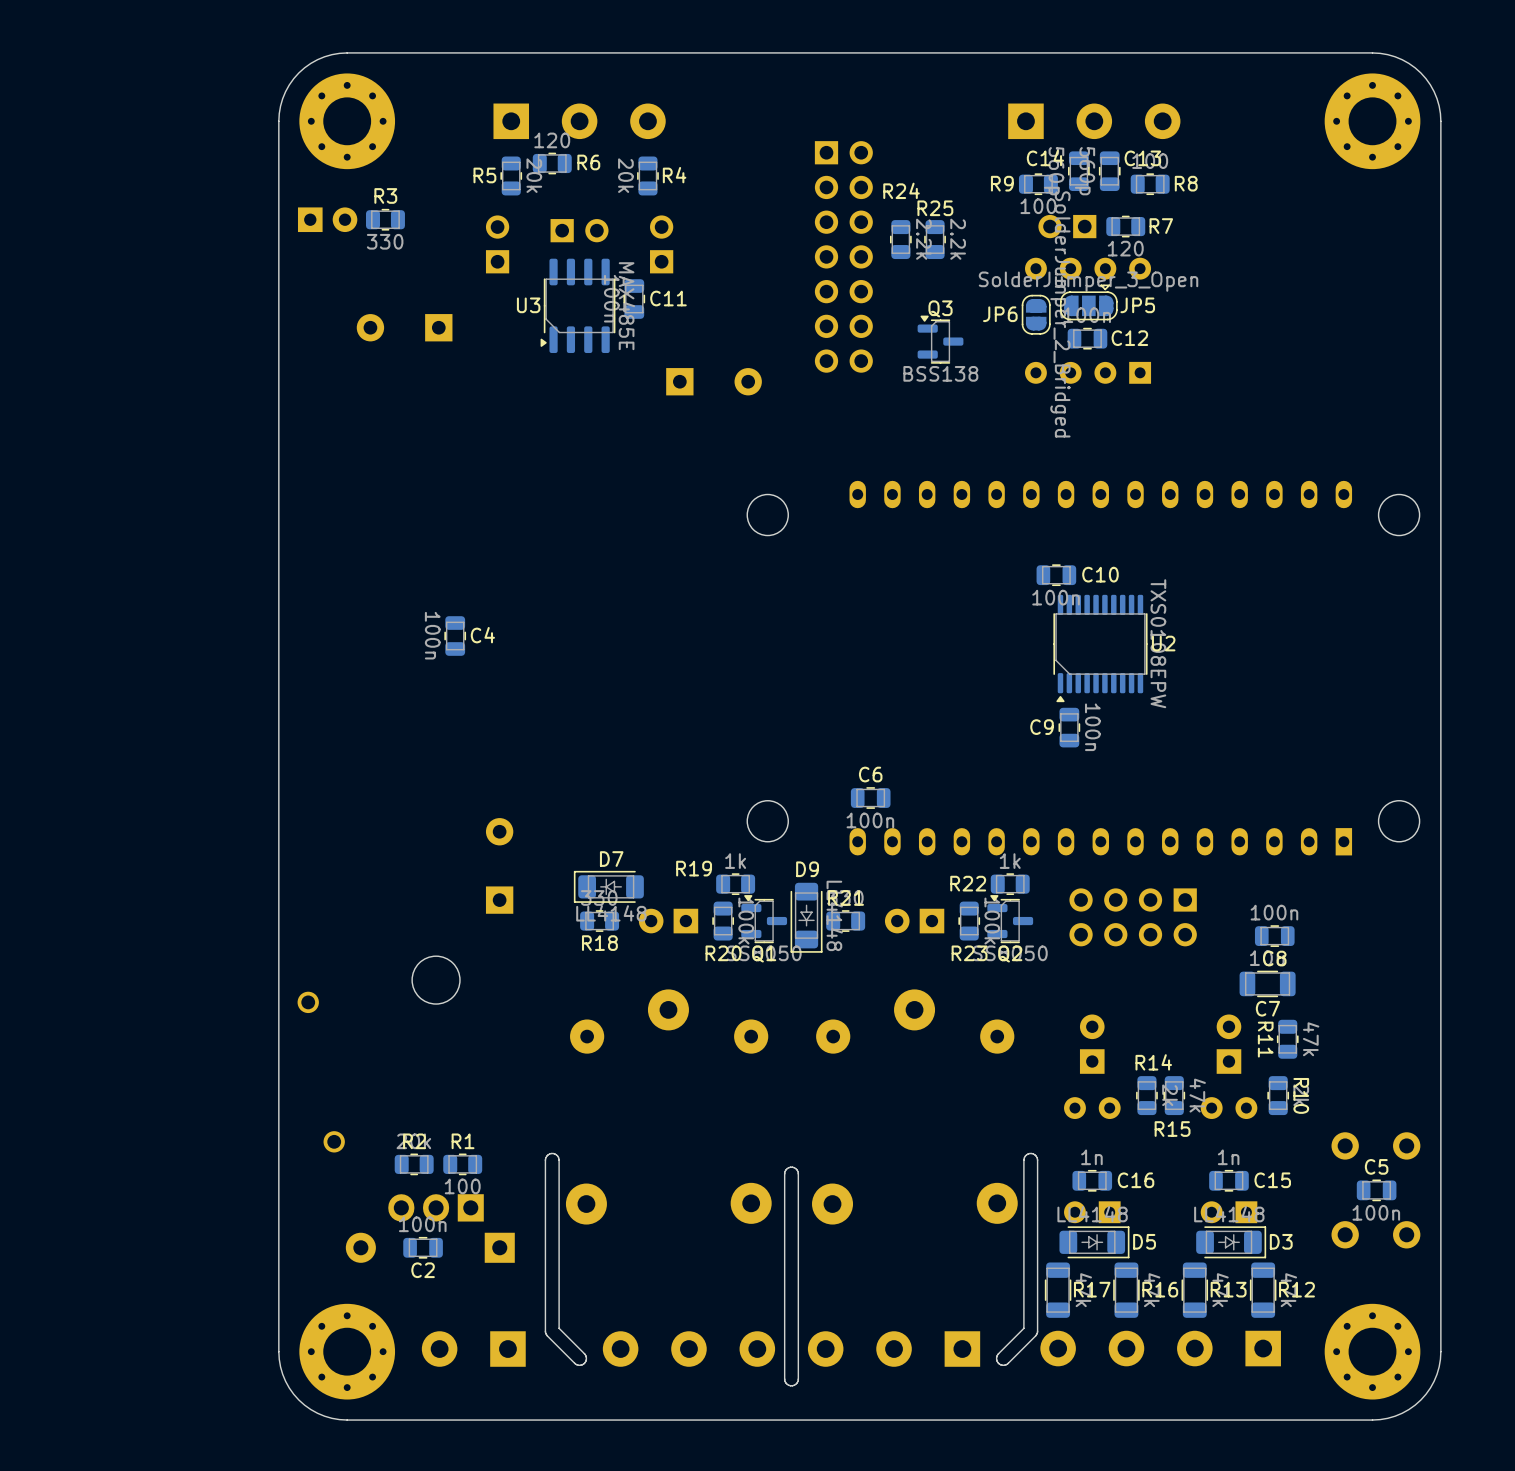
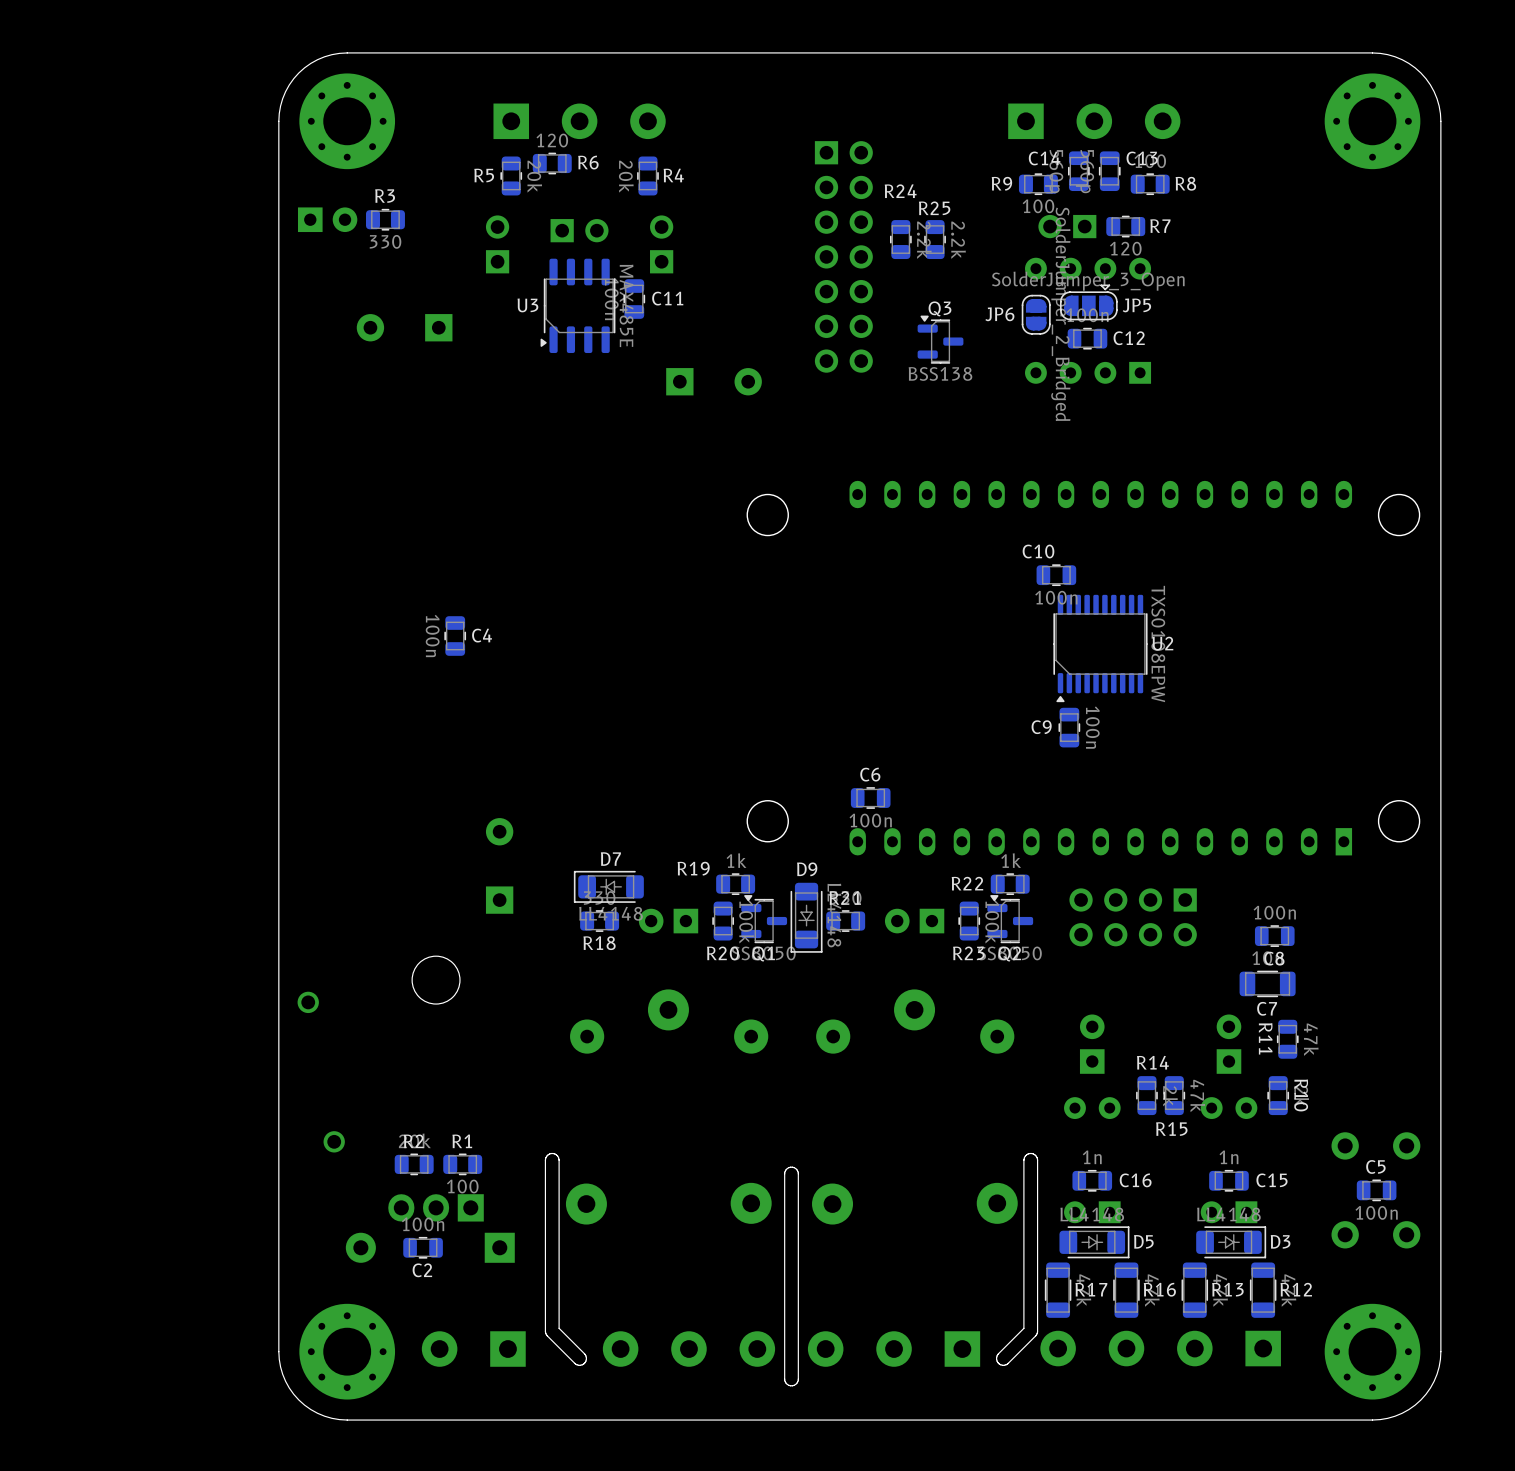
C10 name position: C10 (1100, 574) -> C10 (1038, 551)

